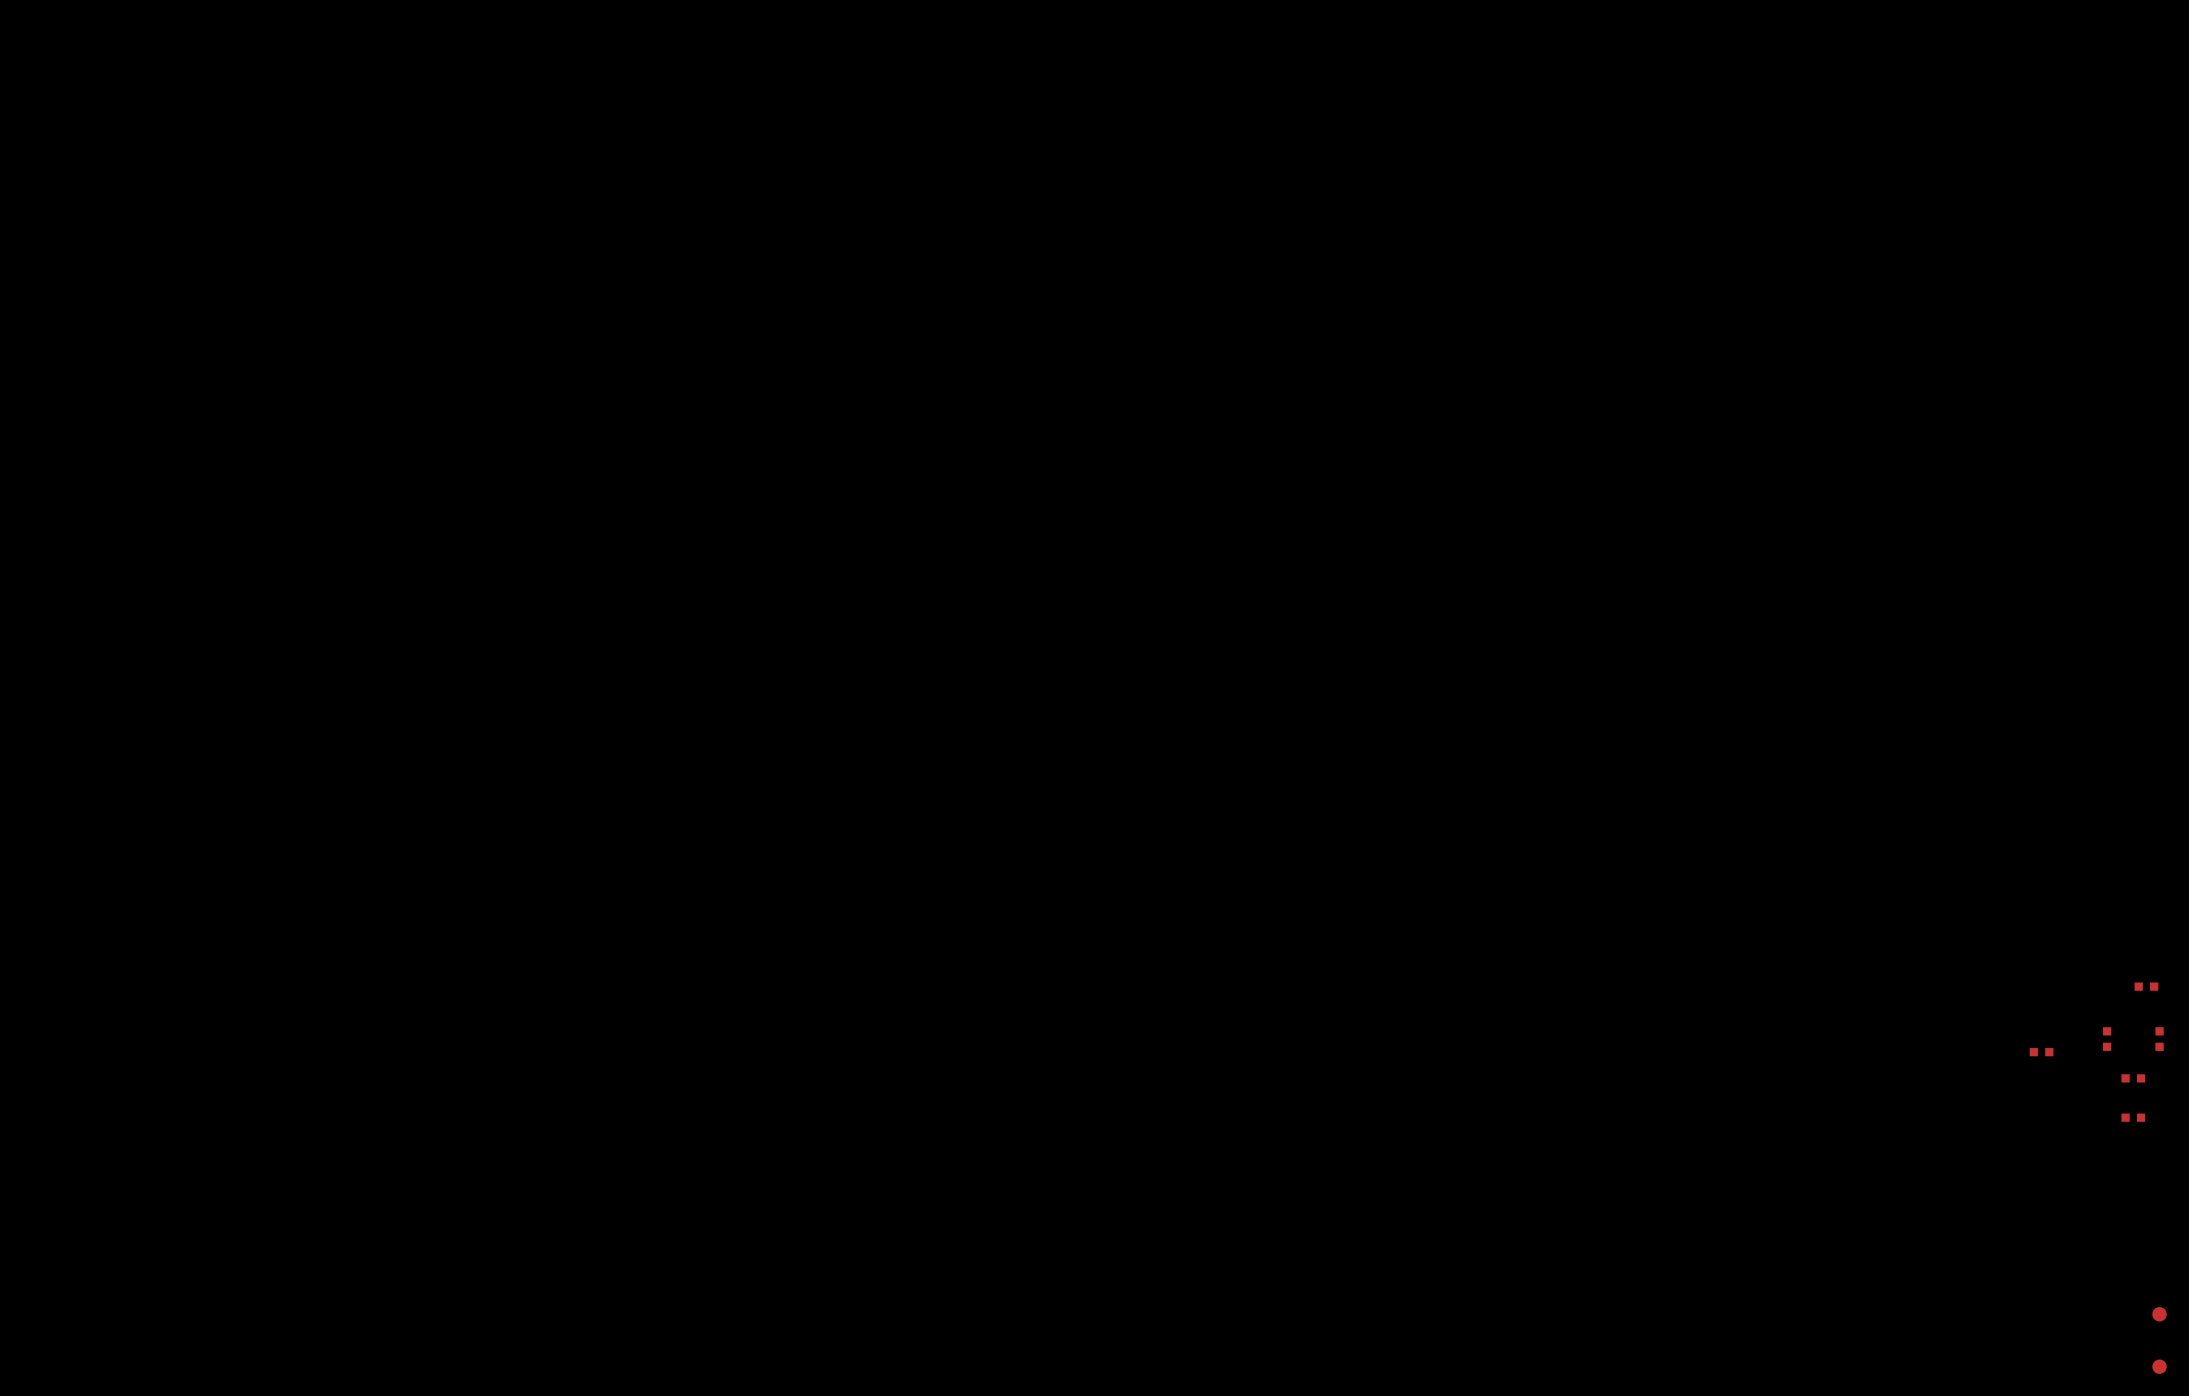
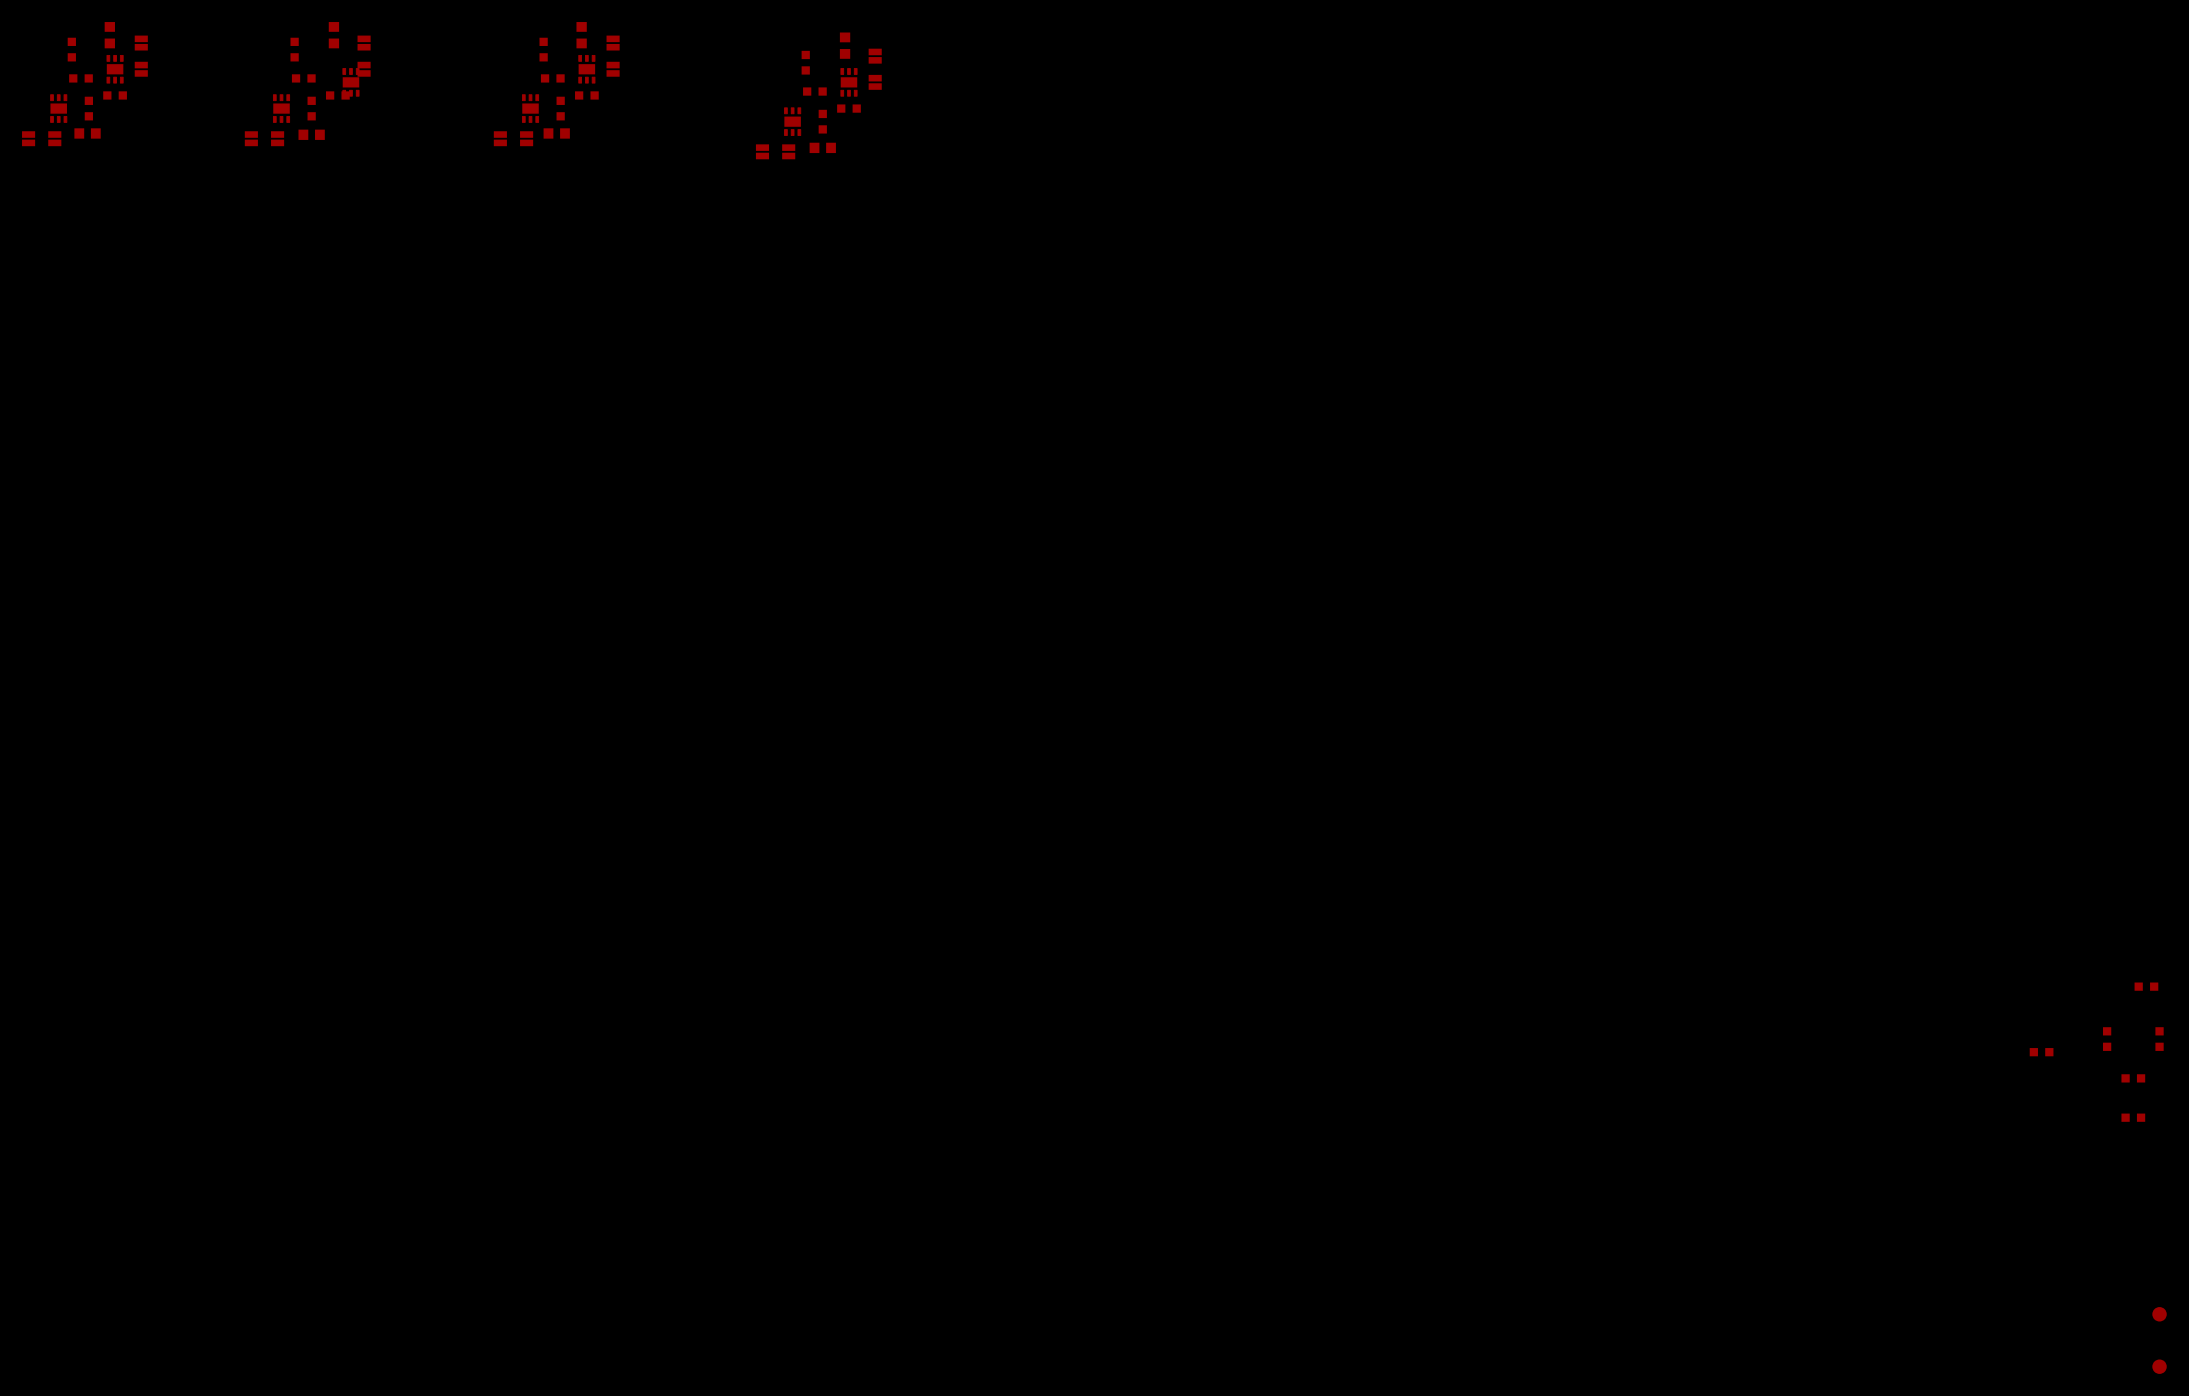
part: none -> (109, 35)
part: none -> (333, 35)
part: none -> (581, 35)
part: none -> (141, 43)
part: none -> (364, 43)
part: none -> (613, 43)
part: none -> (845, 45)
part: none -> (71, 49)
part: none -> (294, 49)
part: none -> (543, 49)
part: none -> (875, 56)
part: none -> (805, 62)
part: none -> (115, 69)
part: none -> (141, 69)
part: none -> (364, 69)
part: none -> (586, 69)
part: none -> (613, 69)
part: none -> (81, 78)
part: none -> (303, 78)
part: none -> (552, 78)
part: none -> (350, 82)
part: none -> (848, 82)
part: none -> (875, 82)
part: none -> (814, 91)
part: none -> (115, 95)
part: none -> (337, 95)
part: none -> (586, 95)
part: none -> (58, 108)
part: none -> (88, 108)
part: none -> (281, 108)
part: none -> (311, 108)
part: none -> (530, 108)
part: none -> (560, 108)
part: none -> (848, 108)
part: none -> (792, 121)
part: none -> (822, 121)
part: none -> (87, 133)
part: none -> (556, 133)
part: none -> (311, 134)
part: none -> (28, 138)
part: none -> (54, 138)
part: none -> (251, 138)
part: none -> (277, 138)
part: none -> (500, 138)
part: none -> (526, 138)
part: none -> (822, 147)
part: none -> (762, 151)
part: none -> (788, 151)

